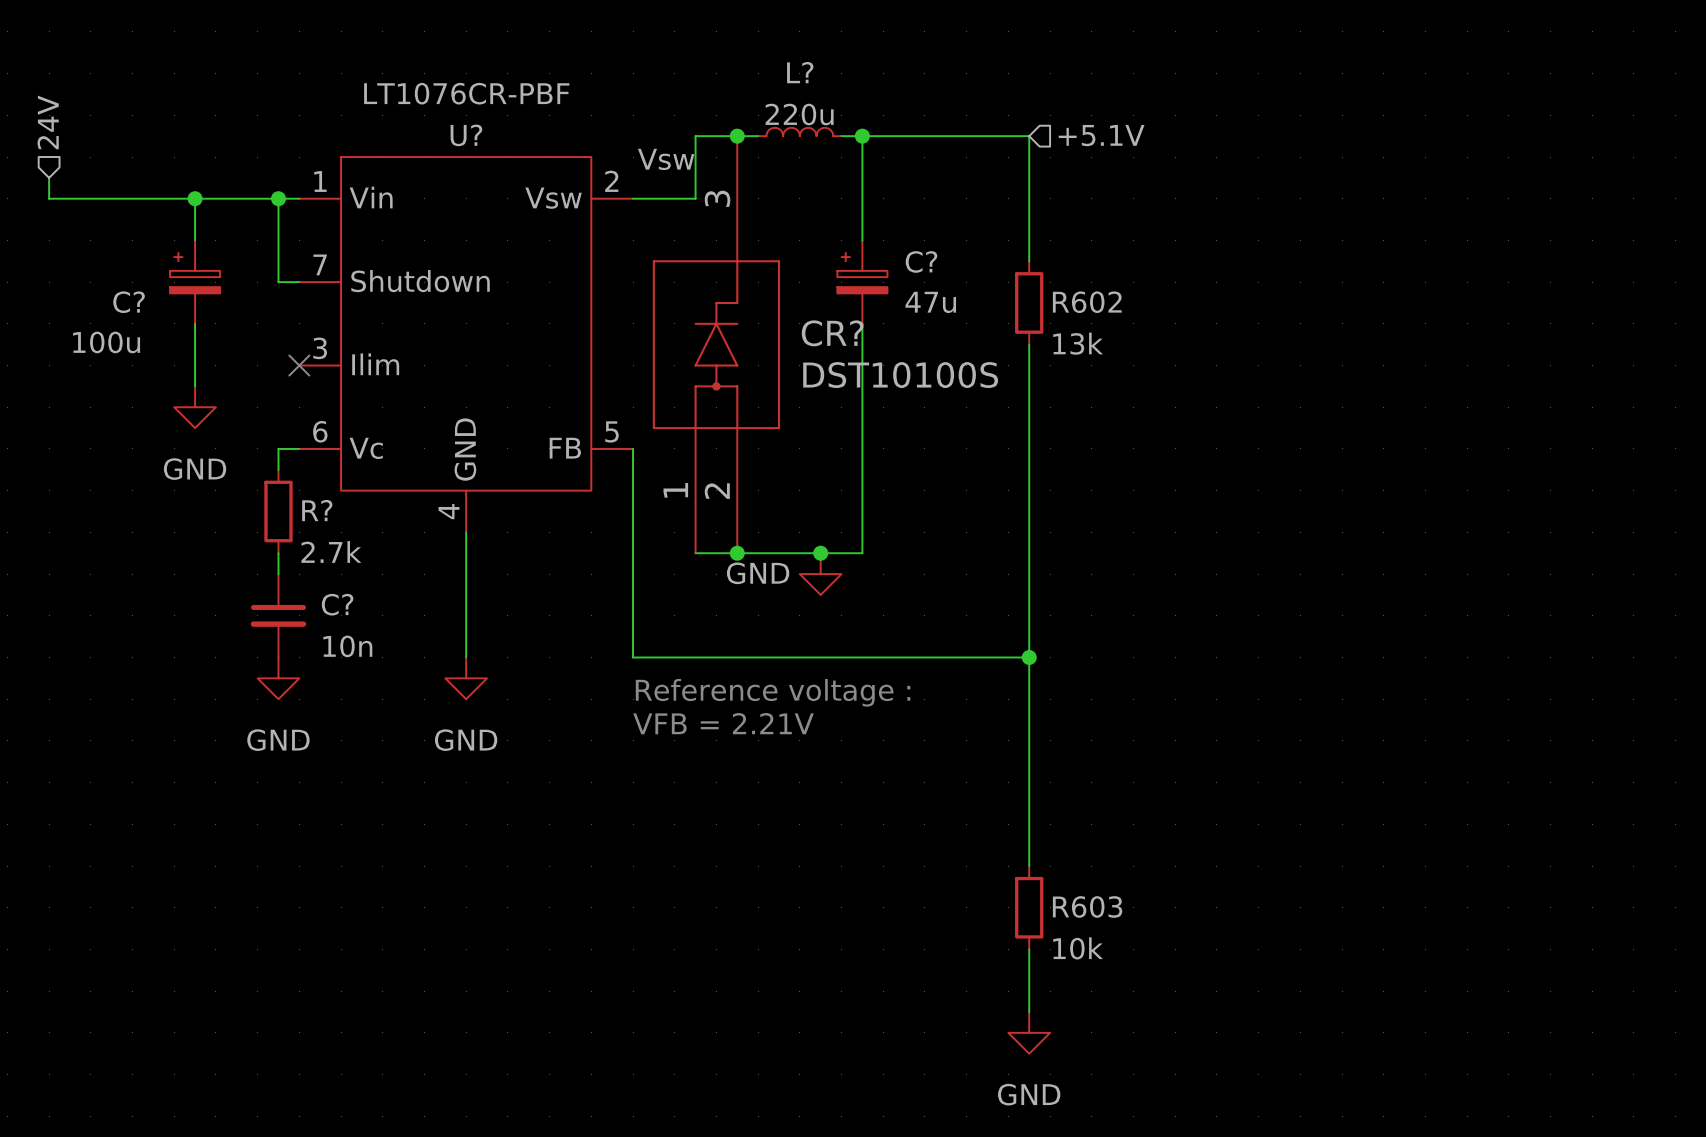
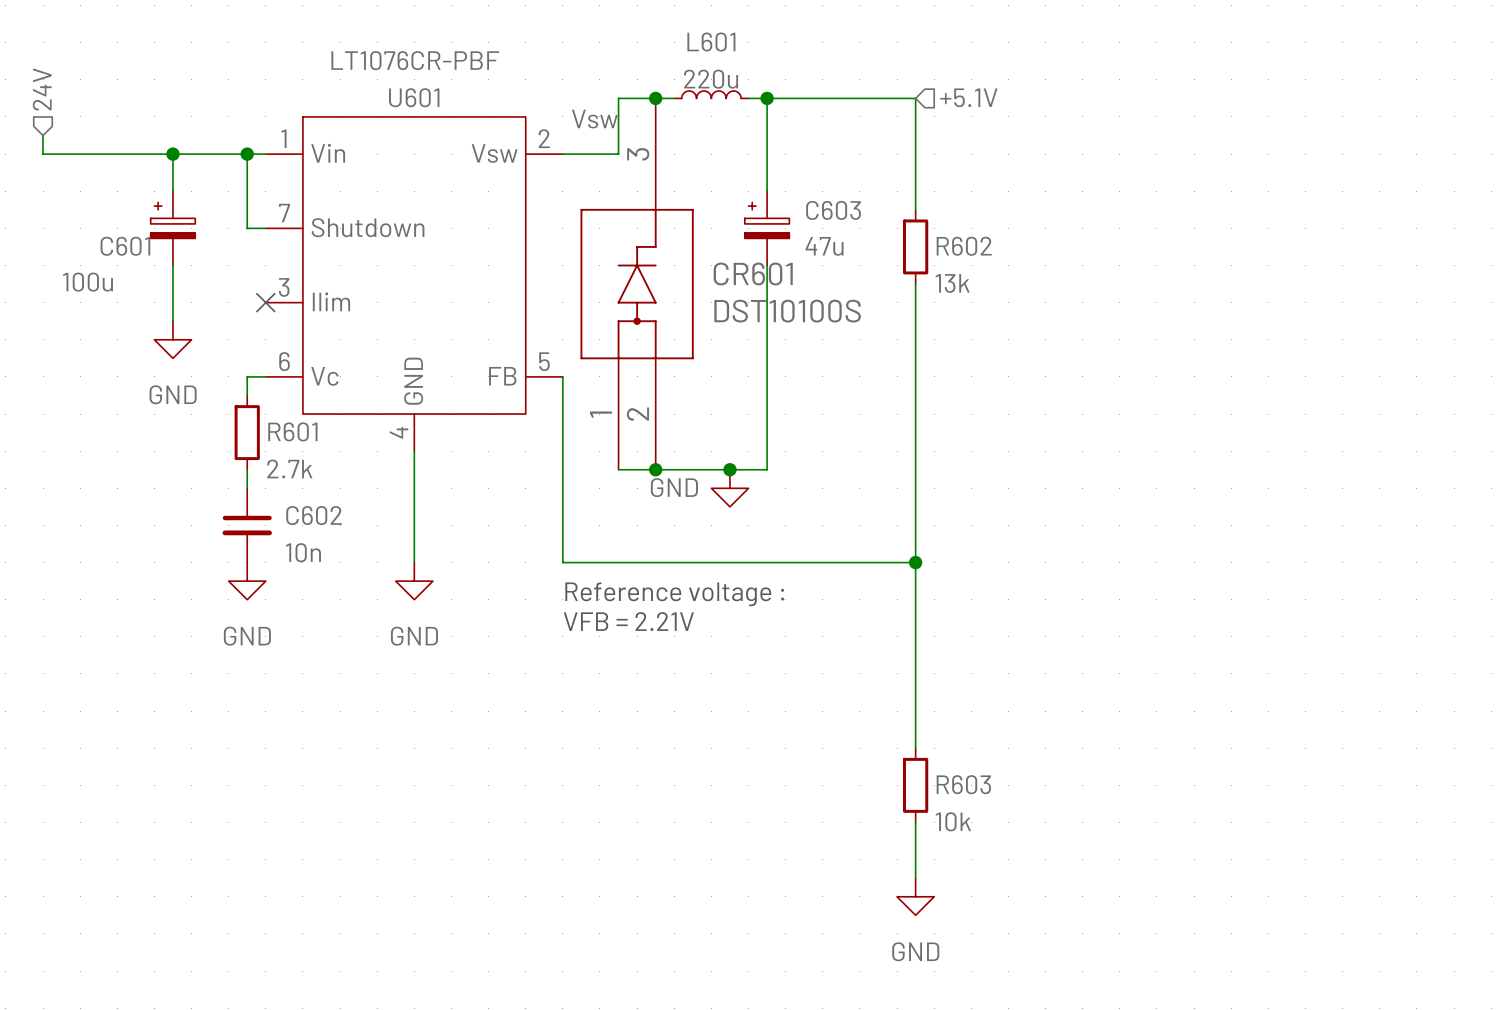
L? name: L? (800, 72) -> L601 (711, 42)
U? name: U? (466, 135) -> U601 (414, 97)
C? name: C? (921, 261) -> C603 (833, 210)
C? name: C? (129, 302) -> C601 (125, 246)
CR? name: CR? (832, 333) -> CR601 (753, 273)
R? name: R? (317, 510) -> R601 (292, 431)
C? name: C? (337, 604) -> C602 (314, 515)

